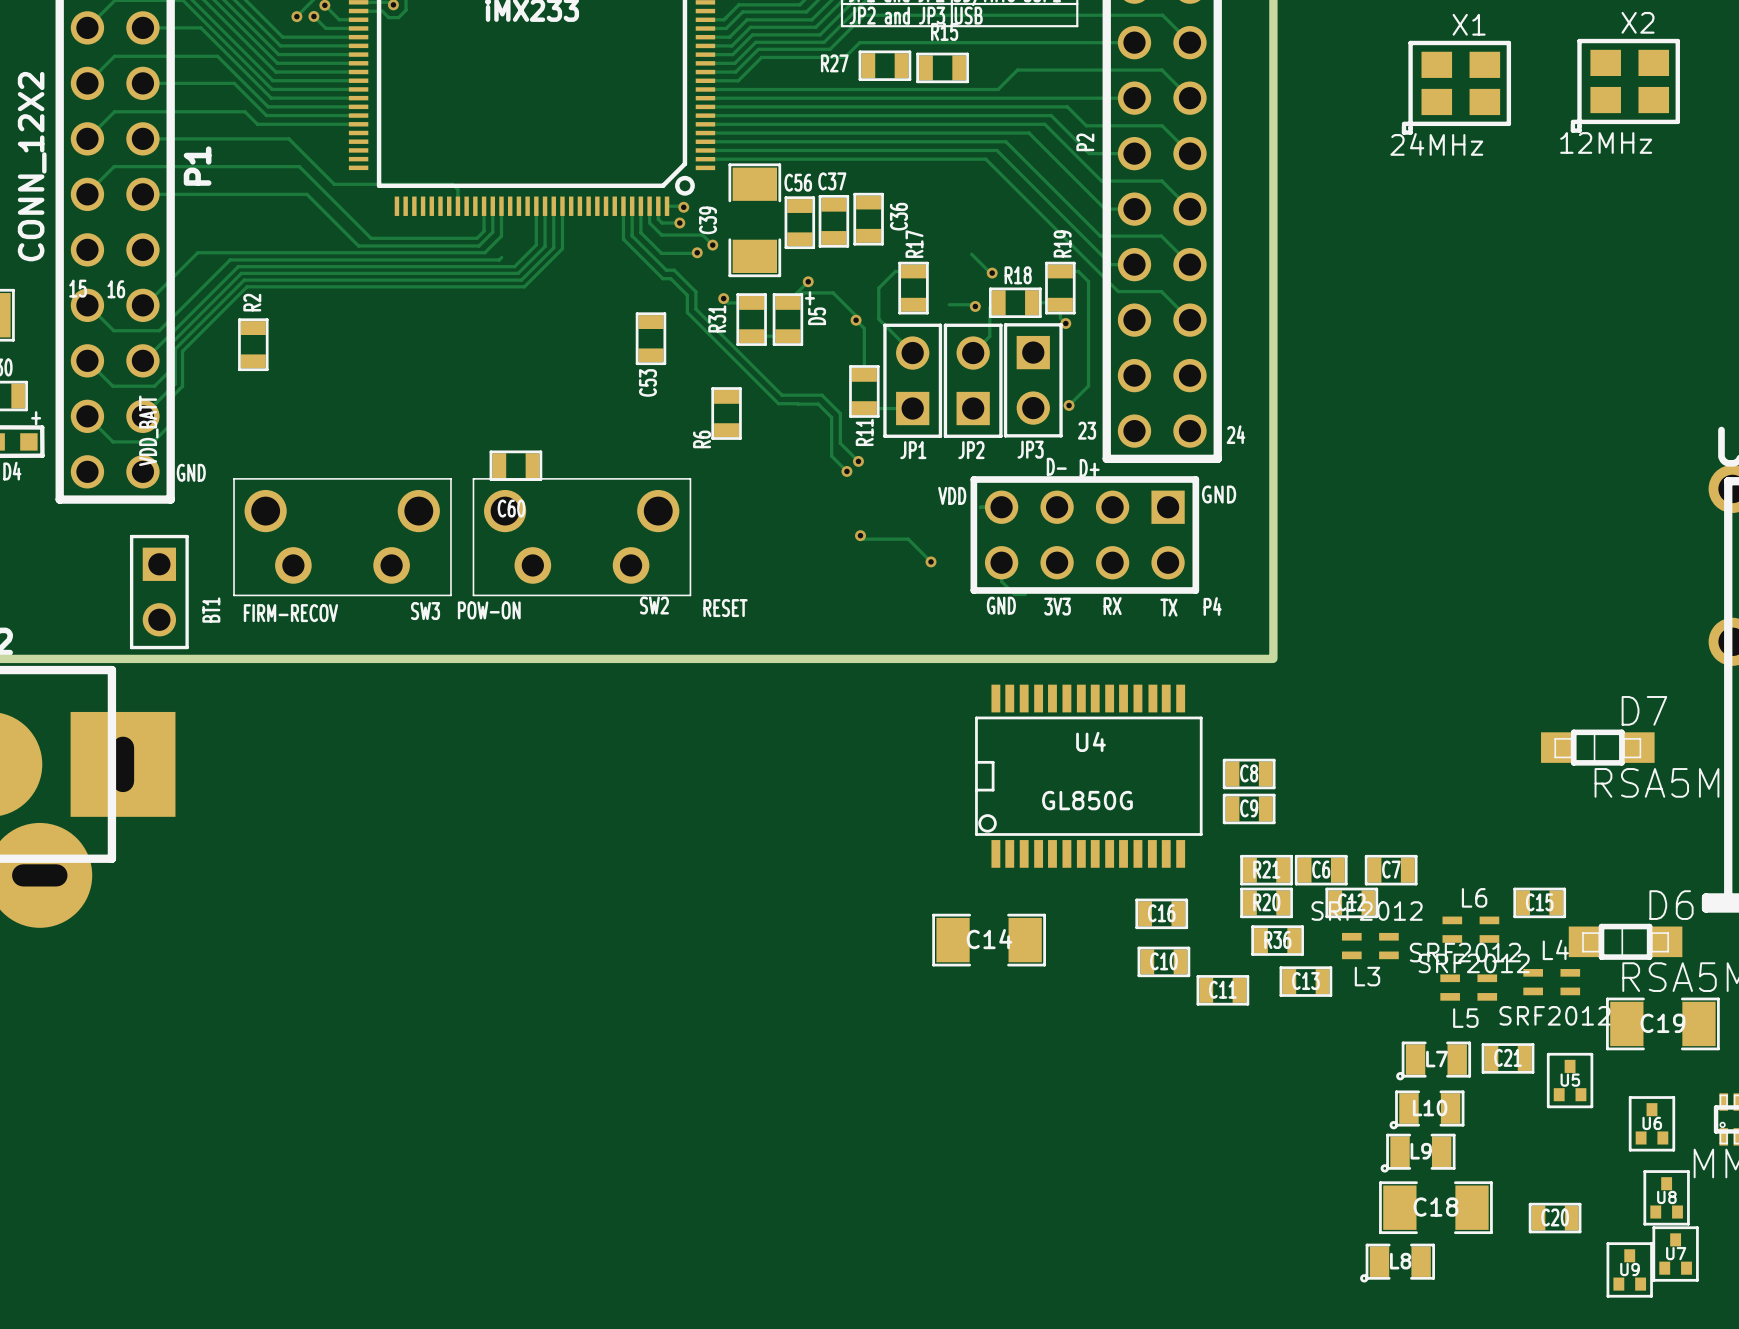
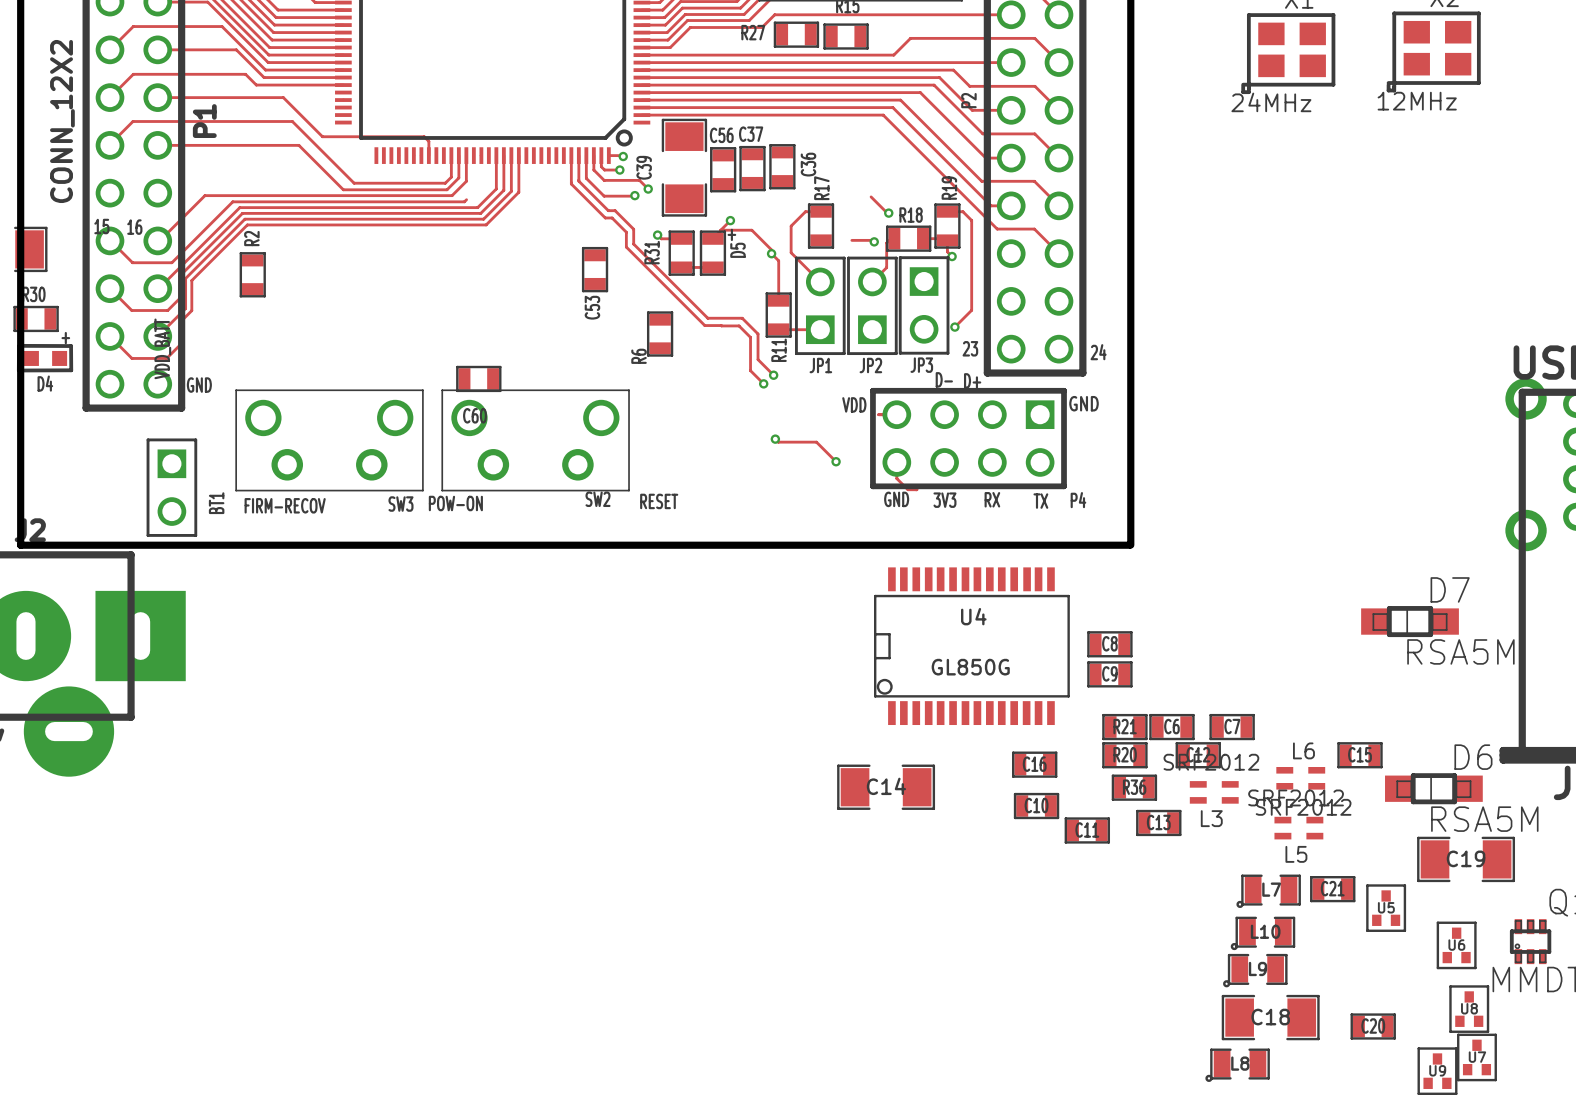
L4: SRF2012 (1551, 982) -> none

